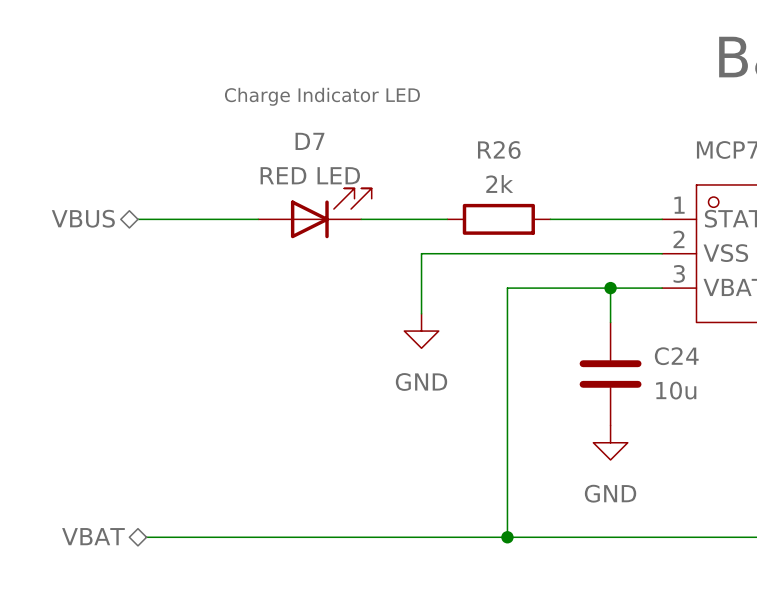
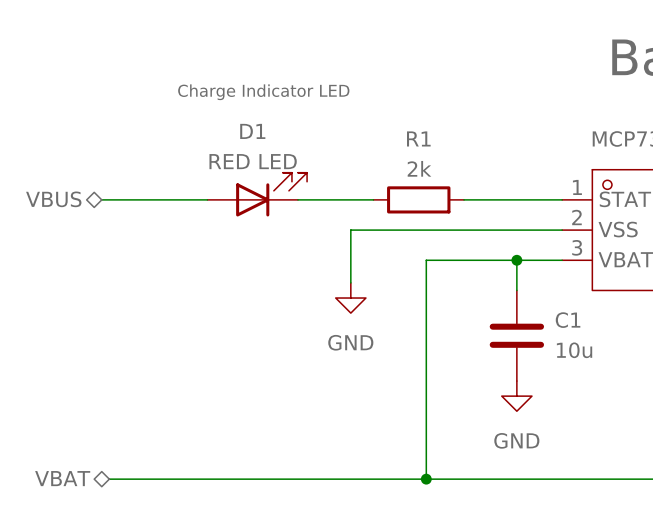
D7 name: D7 (309, 141) -> D1 (252, 131)
R26 name: R26 (499, 149) -> R1 (418, 138)
C24 name: C24 (676, 356) -> C1 (568, 320)

